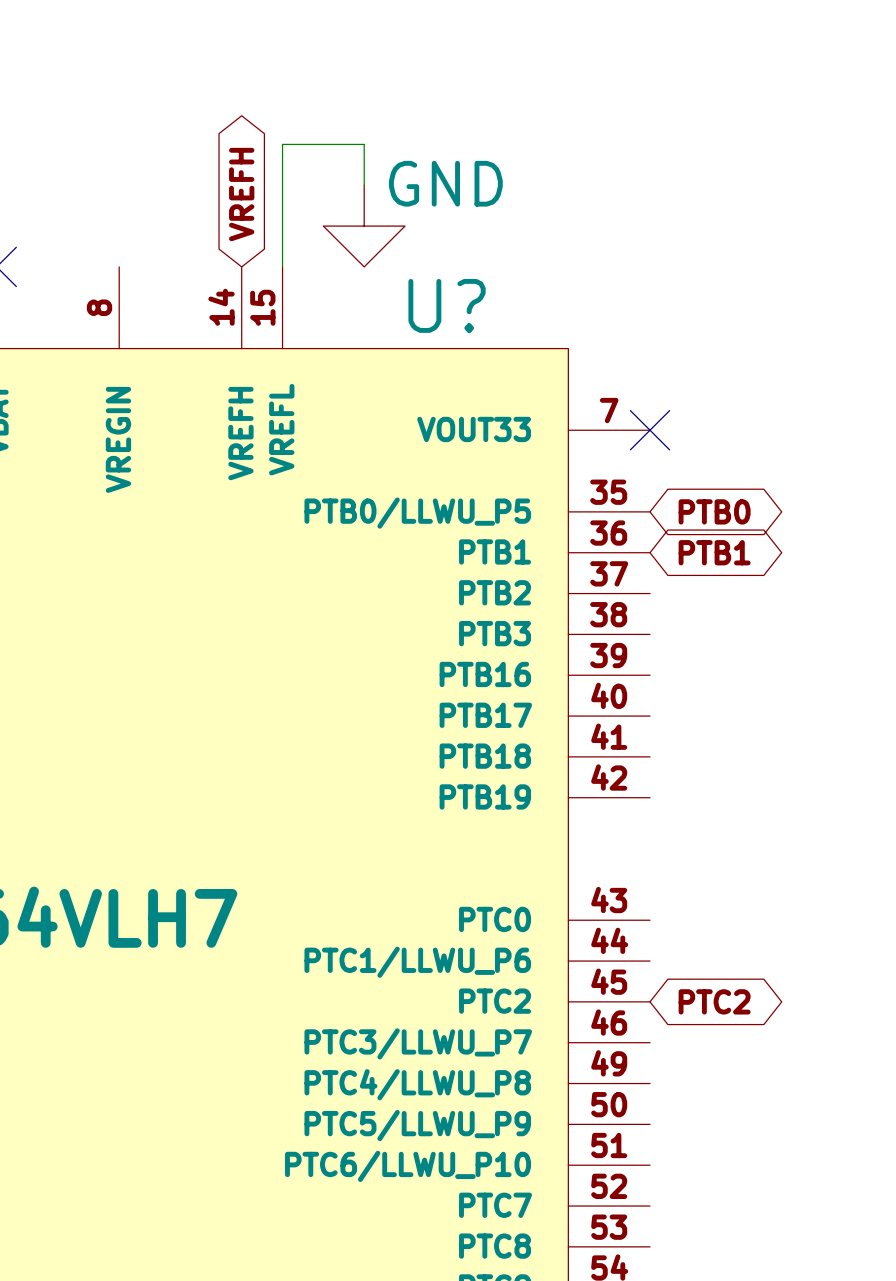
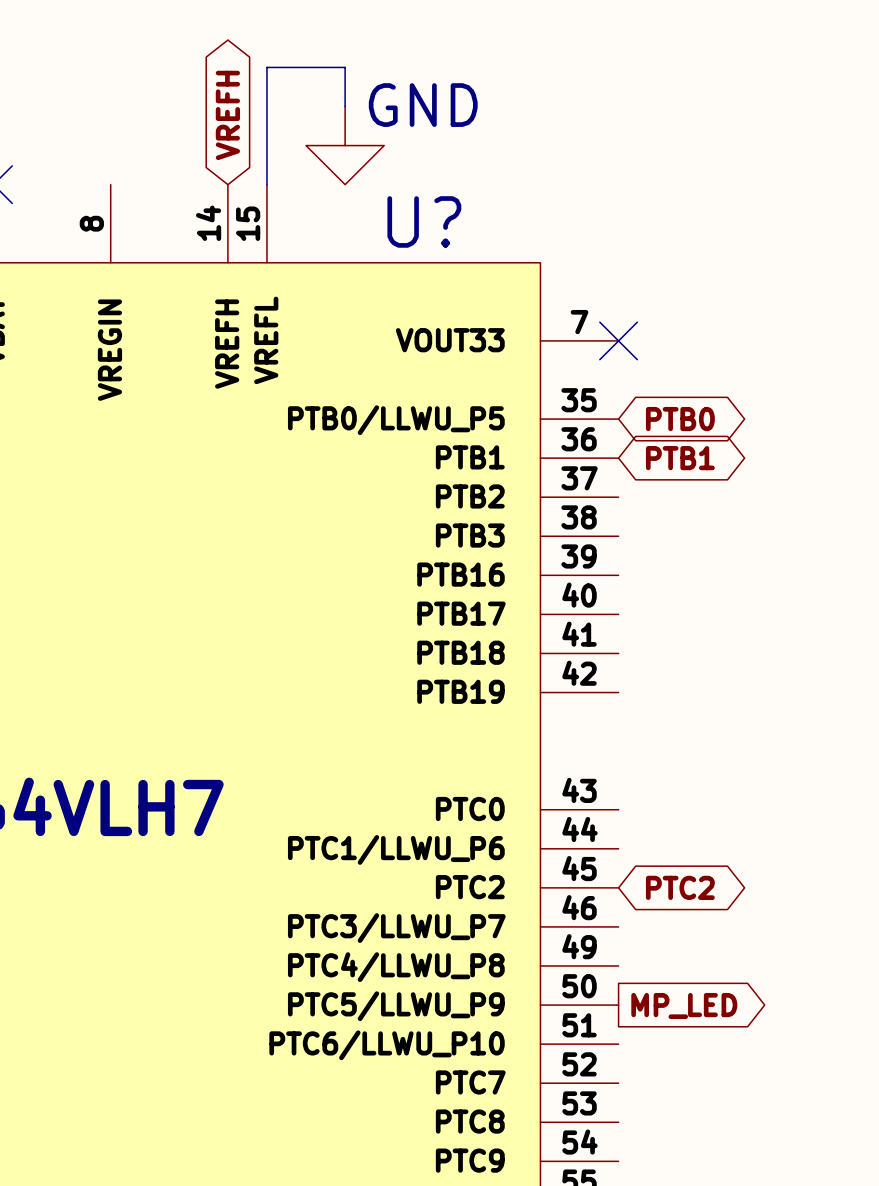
global label: none -> MP_LED (684, 1006)

